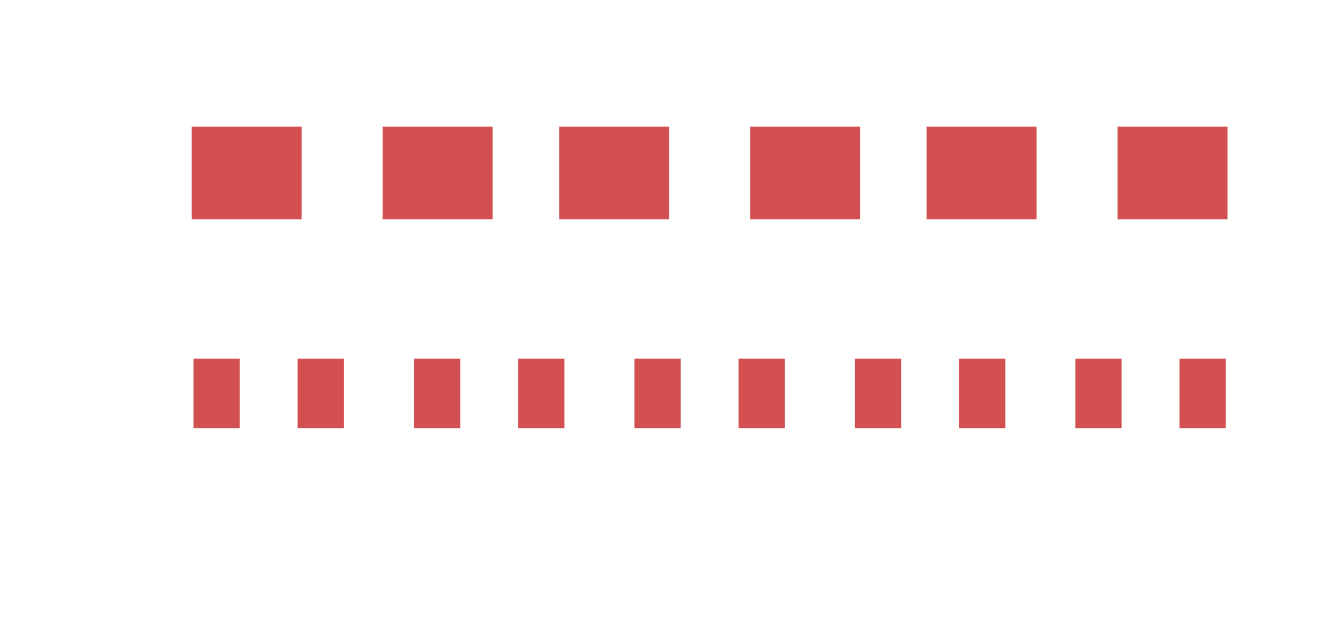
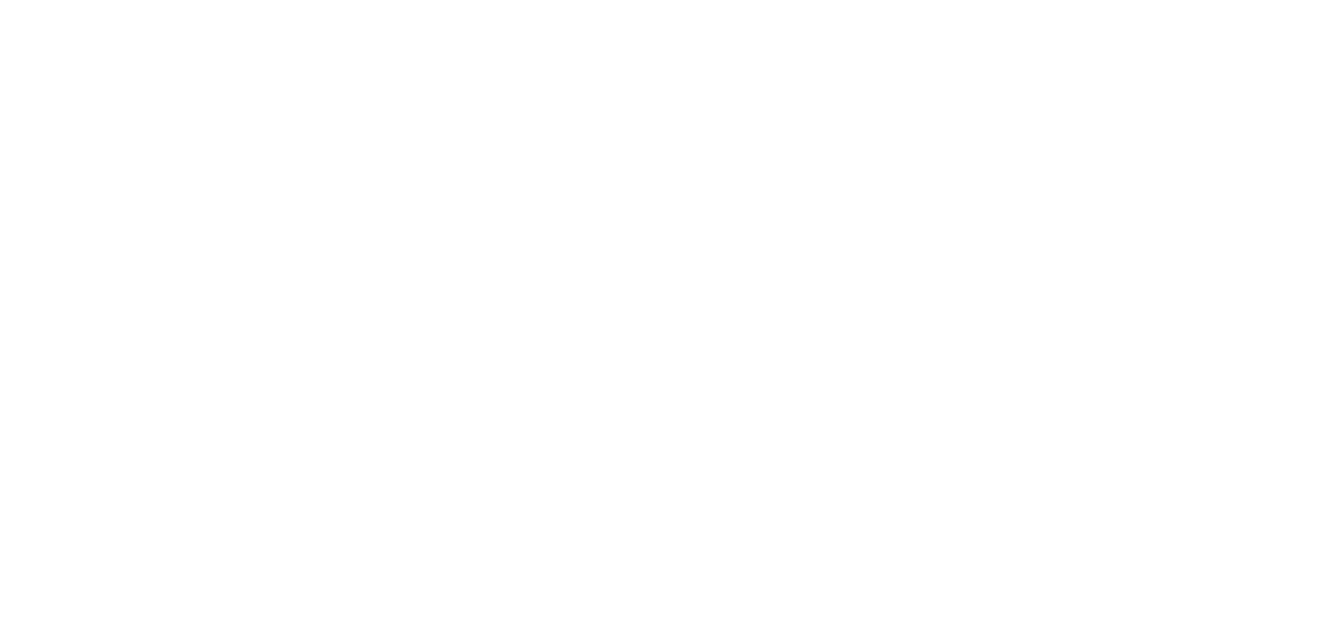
part: (342, 172) -> none
part: (709, 172) -> none
part: (1077, 172) -> none
part: (268, 393) -> none
part: (489, 393) -> none
part: (709, 393) -> none
part: (930, 393) -> none
part: (1150, 393) -> none

